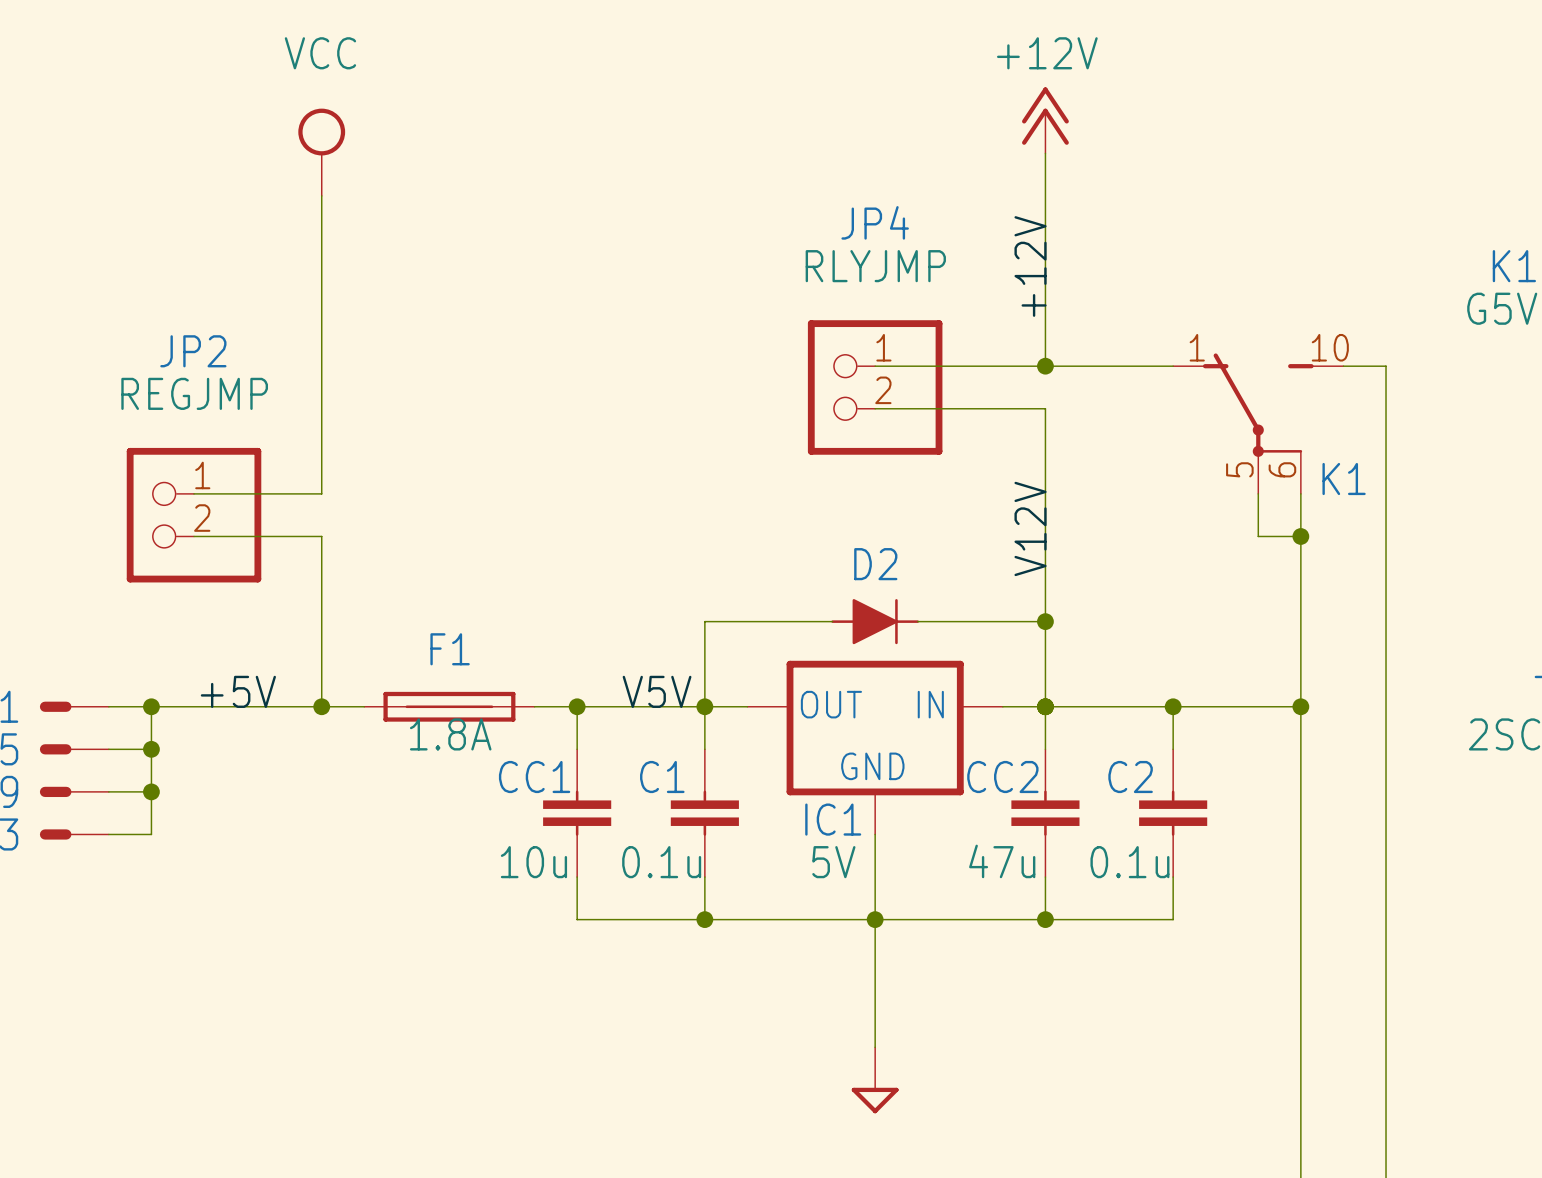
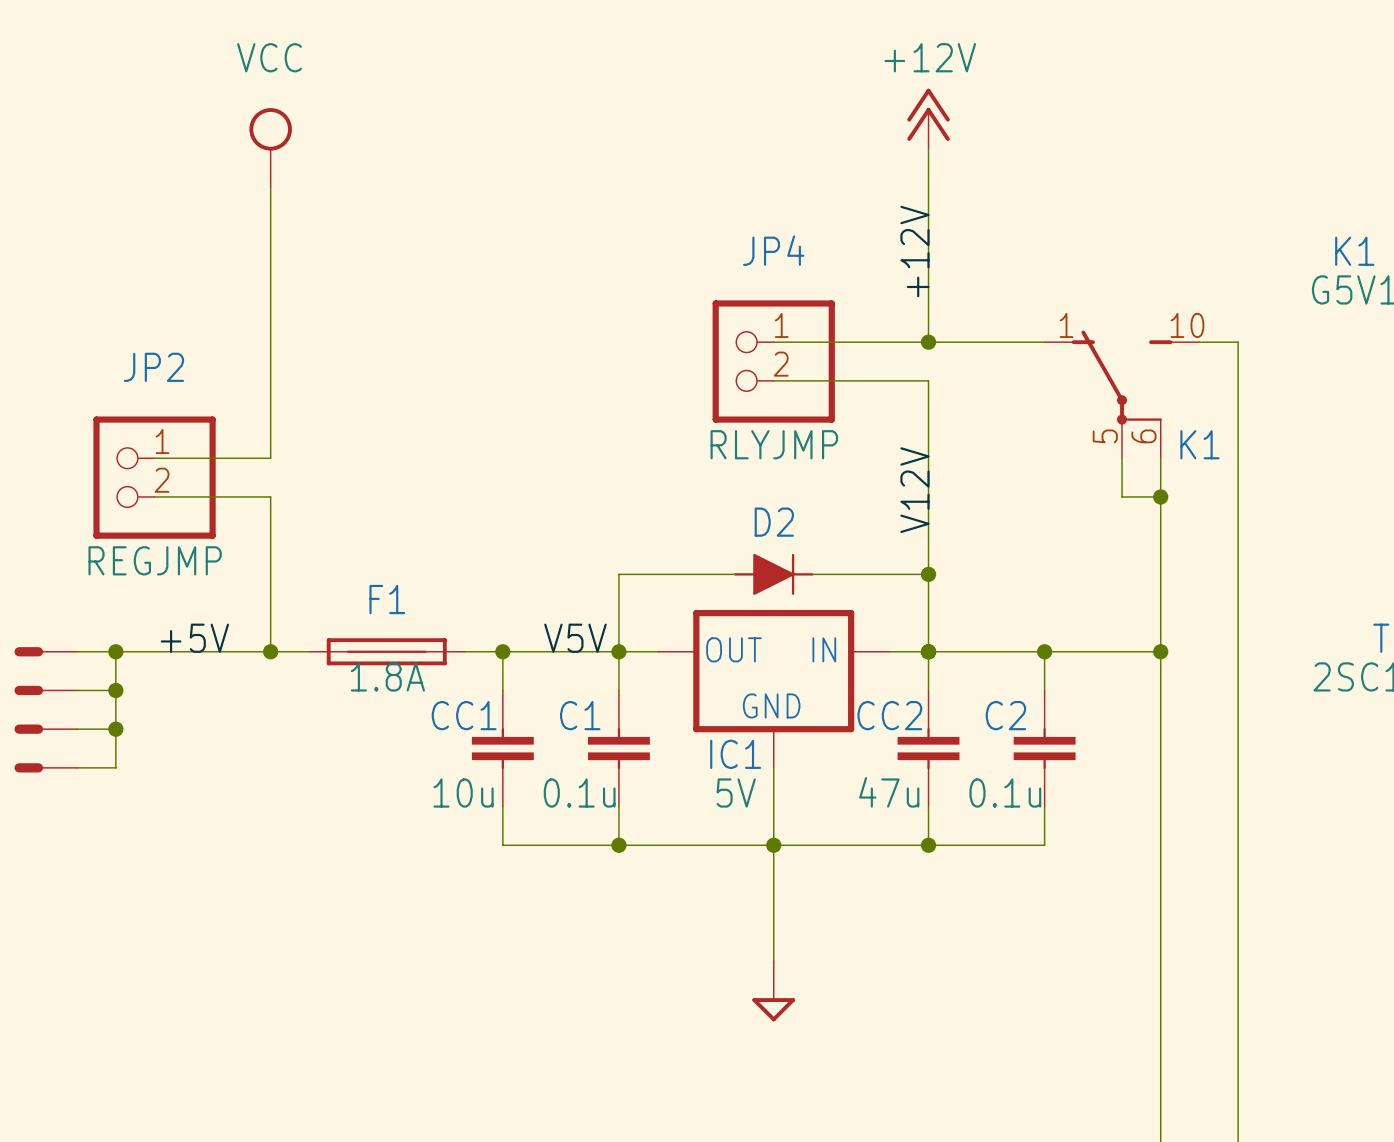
JP4 name position: JP4 (875, 222) -> JP4 (773, 250)
JP4 value position: RLYJMP (875, 266) -> RLYJMP (774, 444)
JP2 name position: JP2 (193, 351) -> JP2 (153, 367)
JP2 value position: REGJMP (194, 393) -> REGJMP (155, 560)

